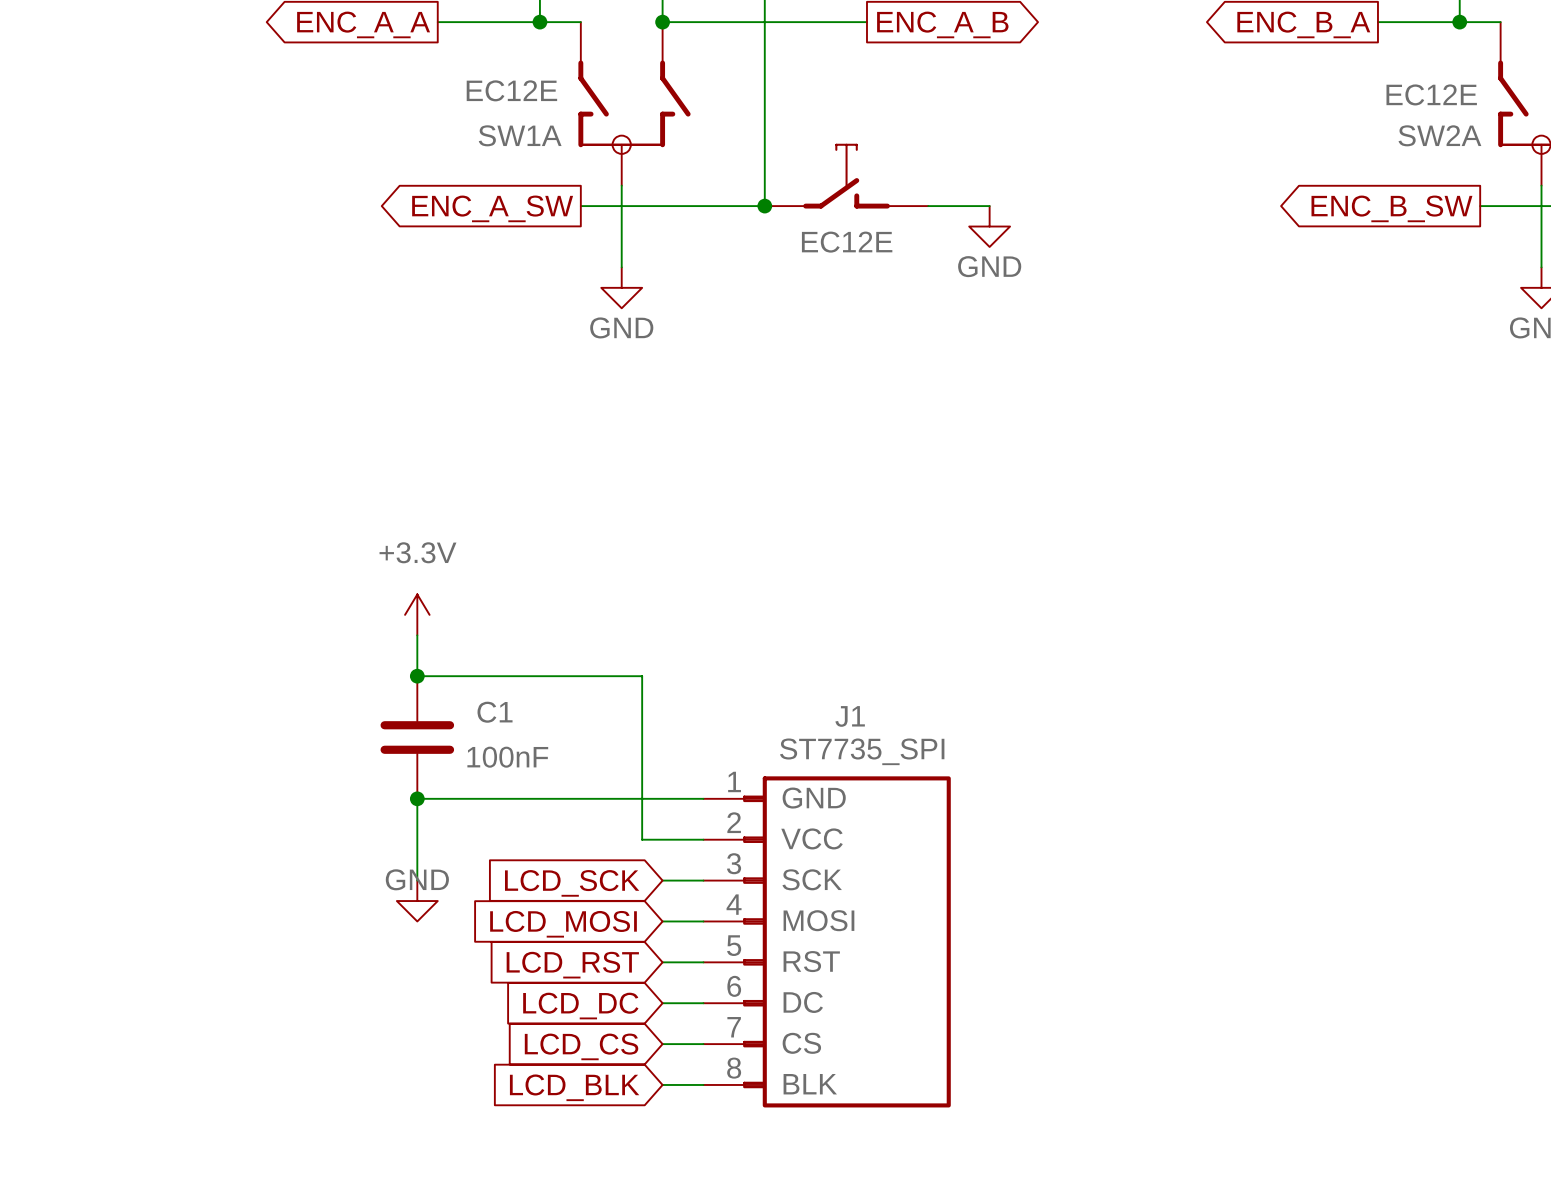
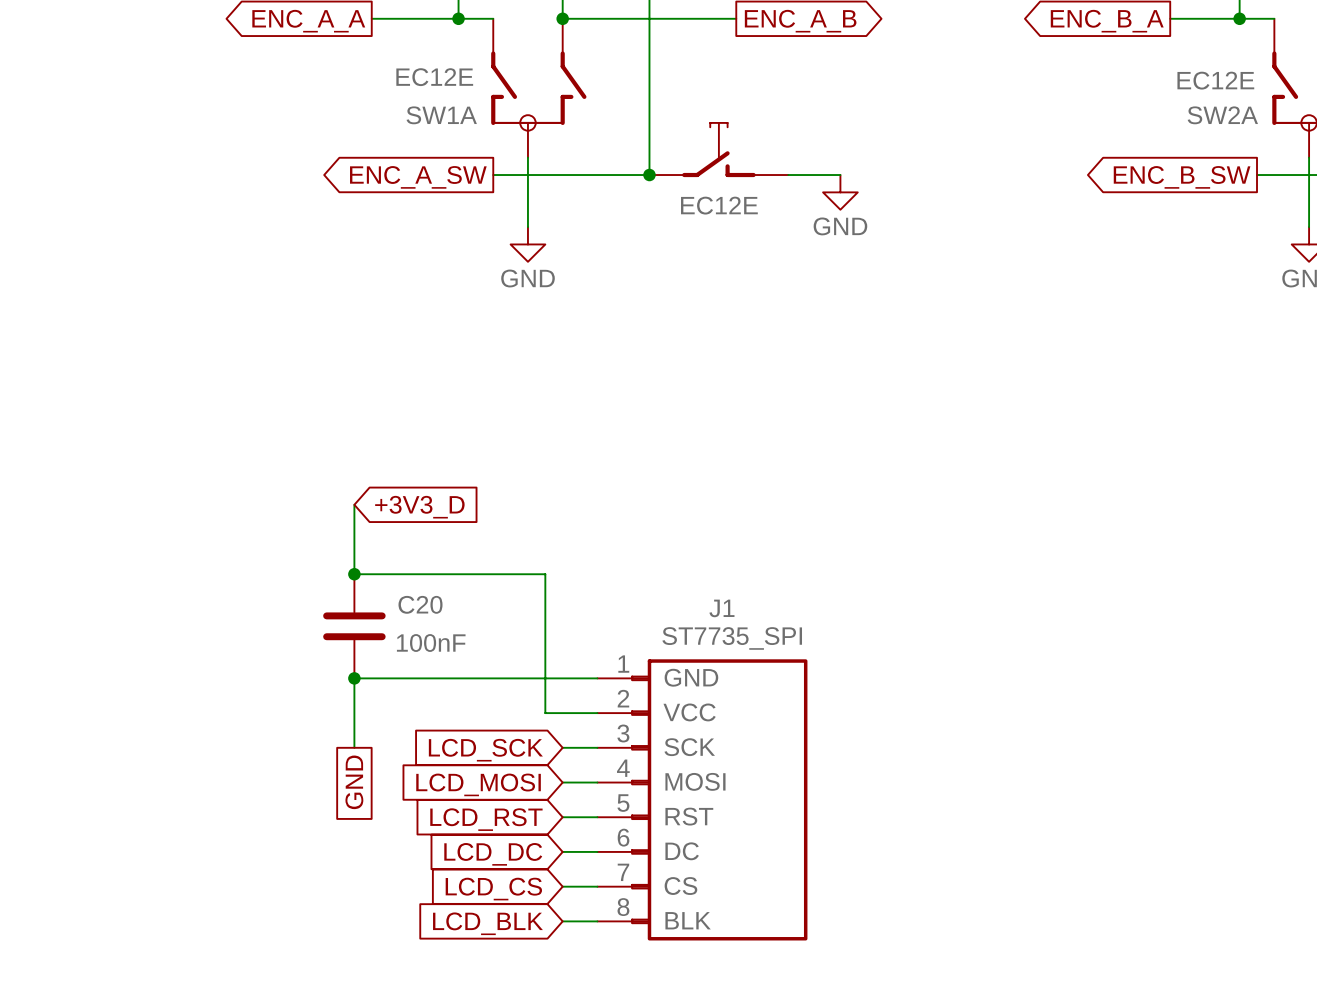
global label: none -> +3V3_D (419, 507)
power symbol: +3.3V (417, 614) -> none
C1 name: C1 (495, 712) -> C20 (420, 604)
power symbol: GND (417, 901) -> none
global label: none -> GND (354, 782)

